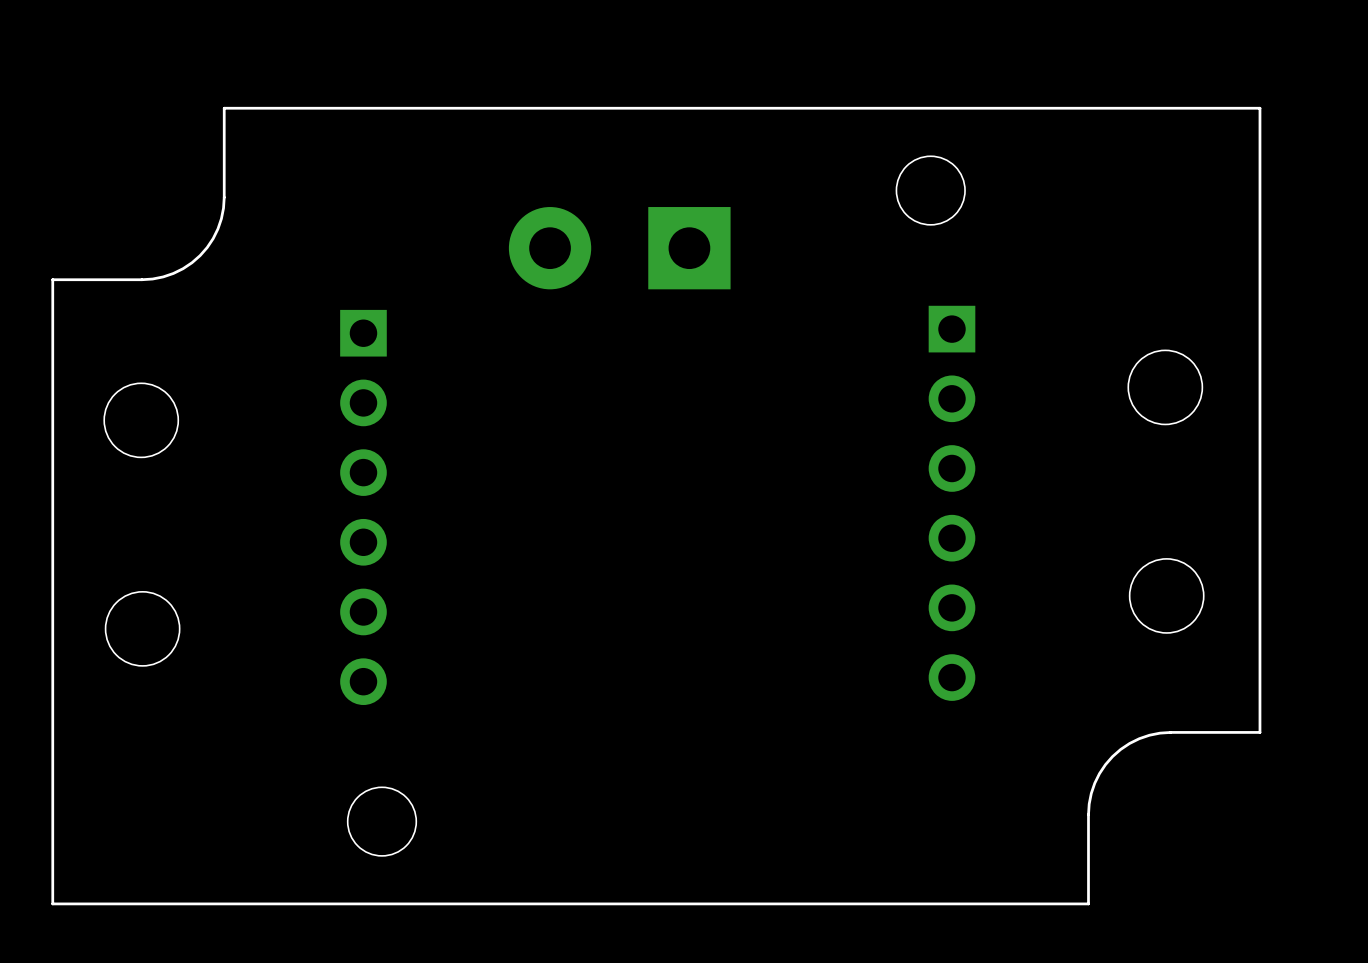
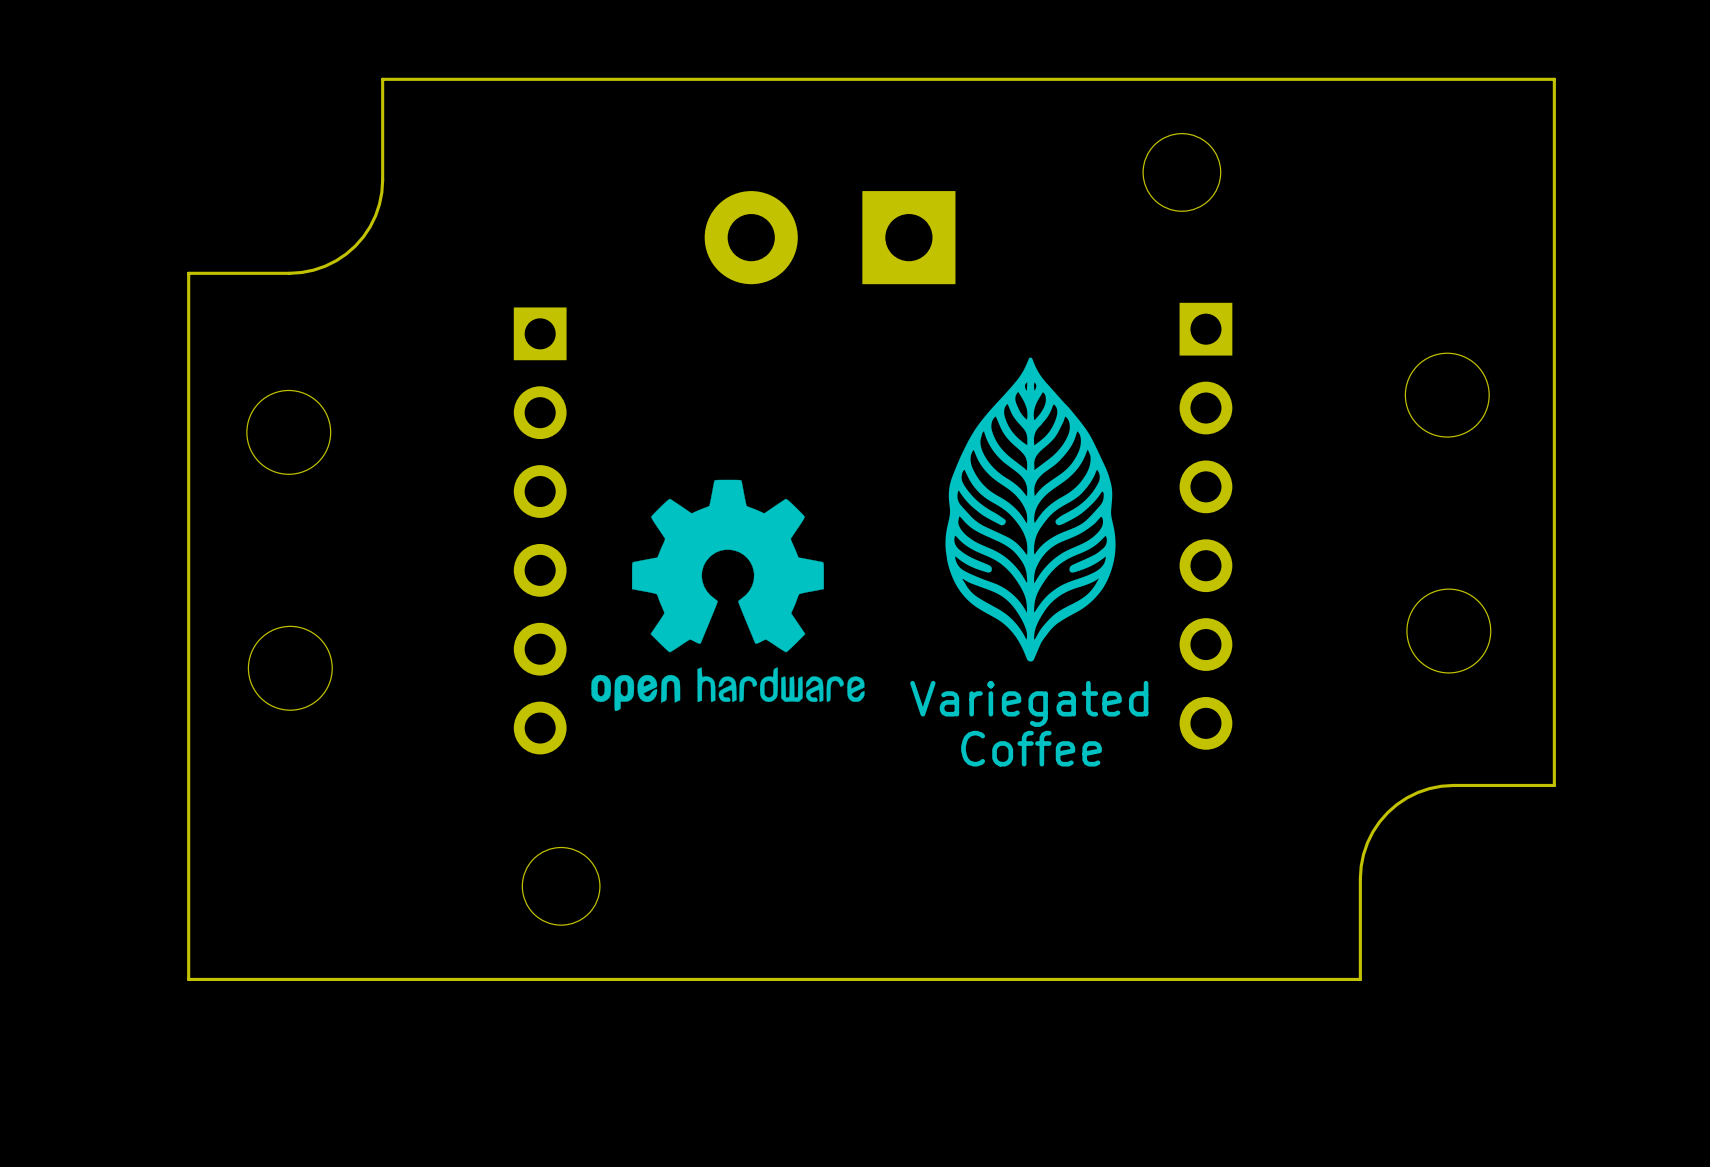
drawing: none -> [591, 357, 1116, 712]

